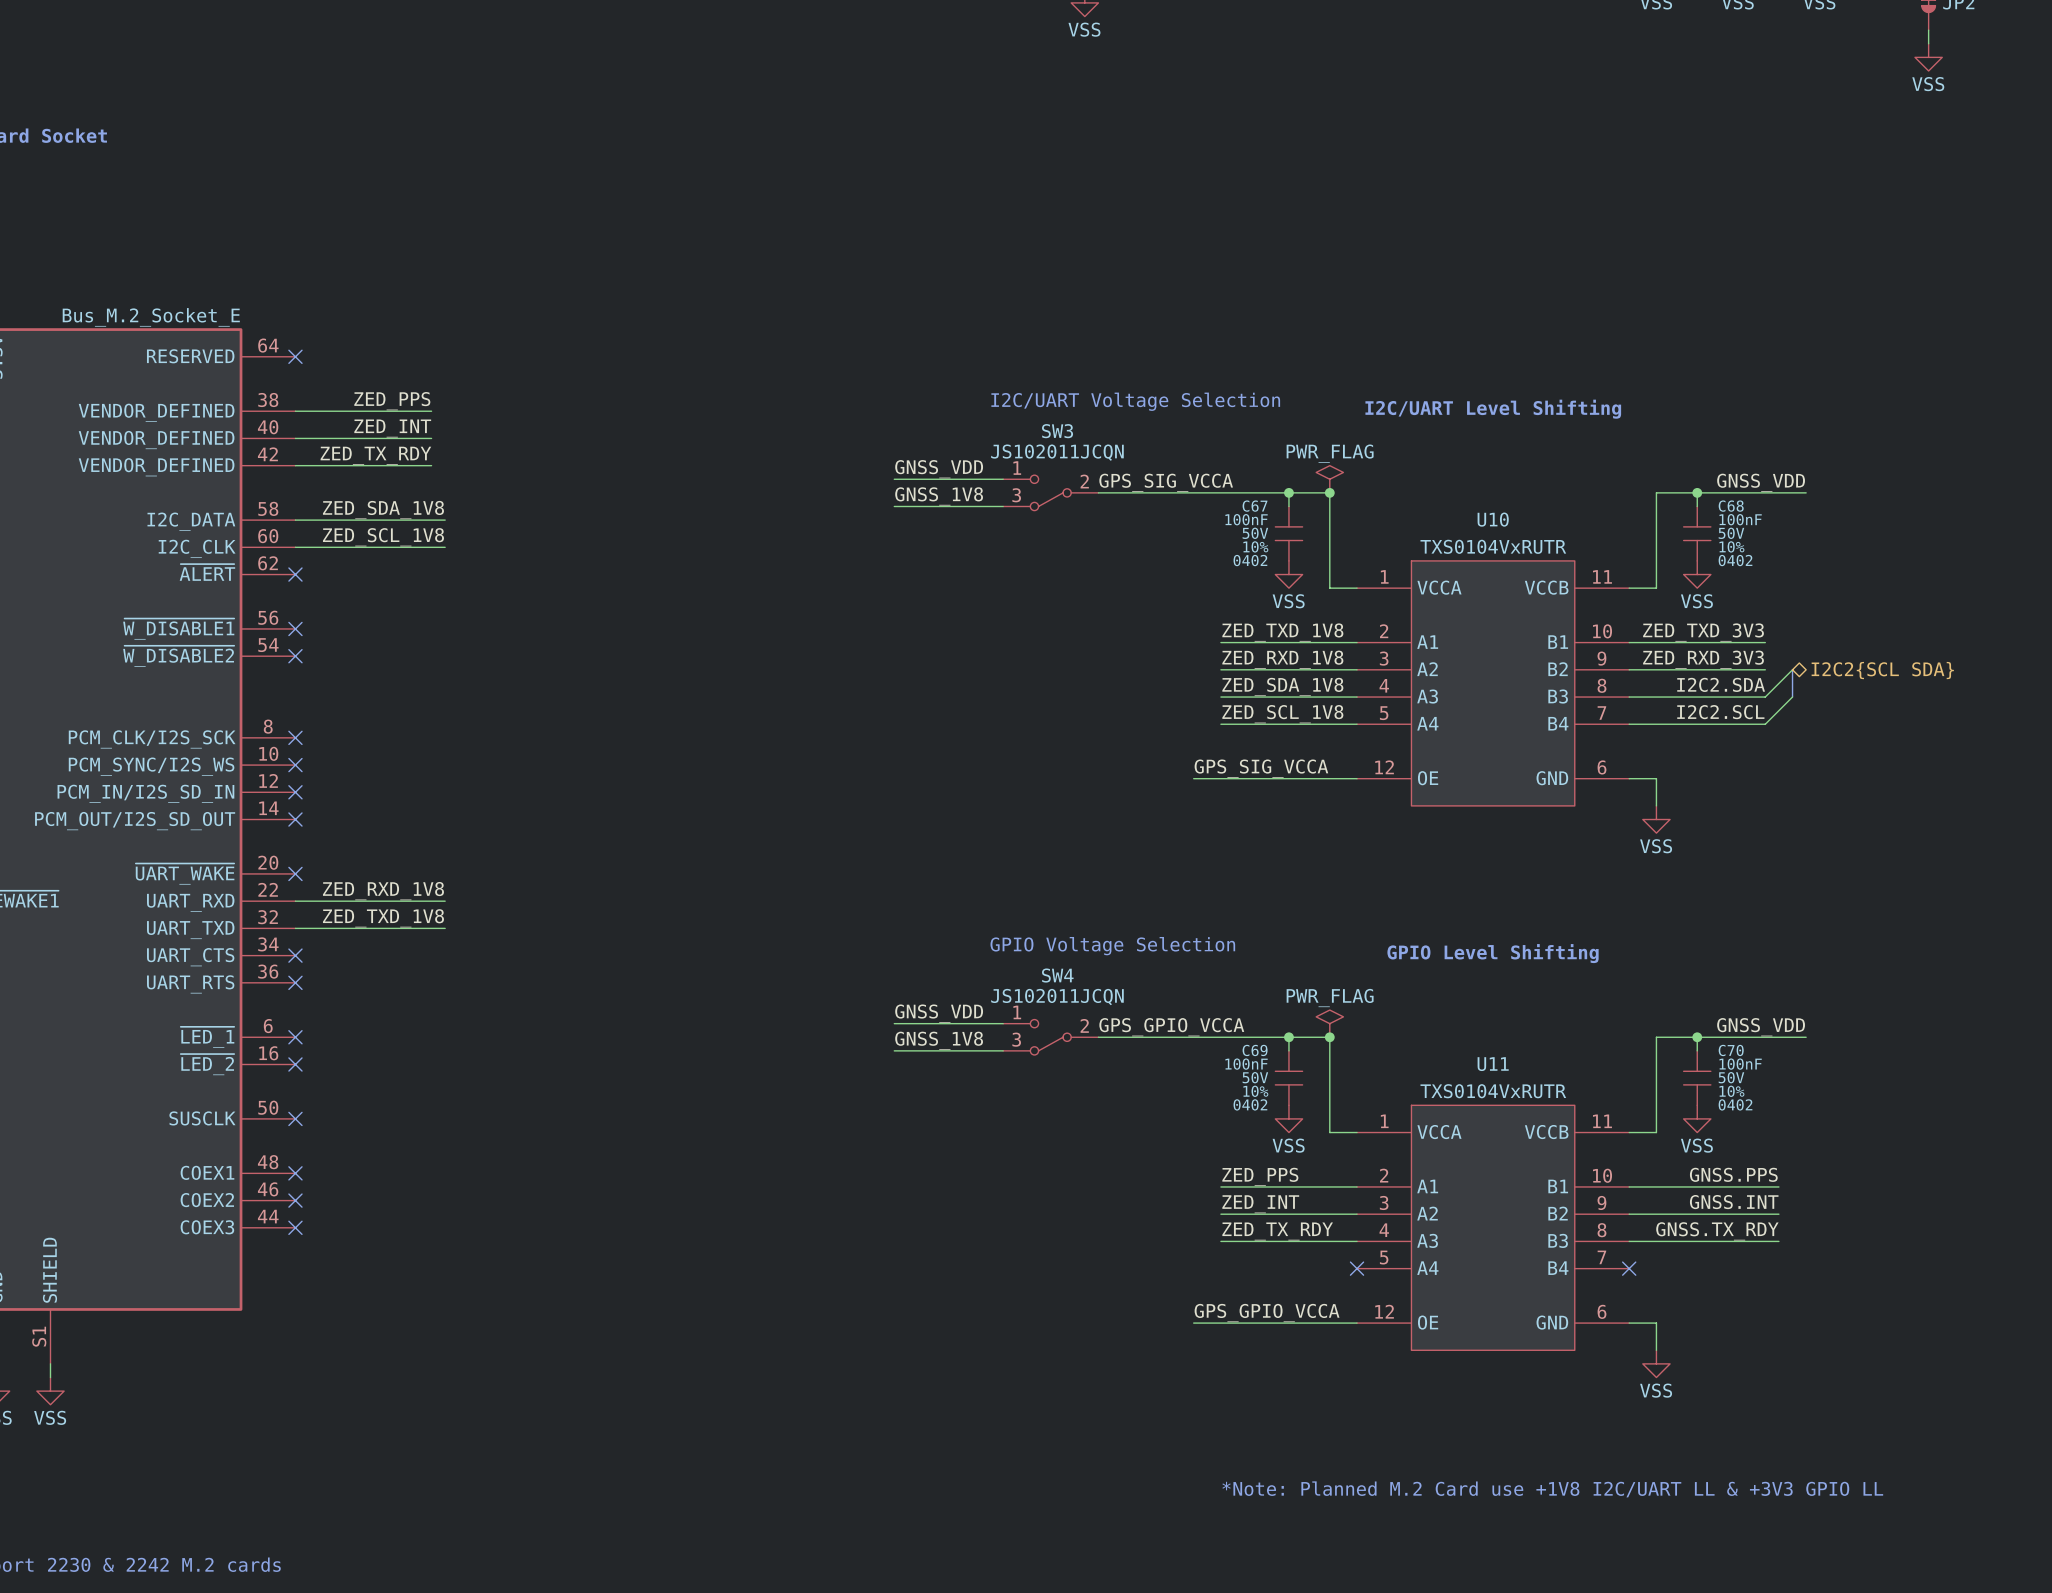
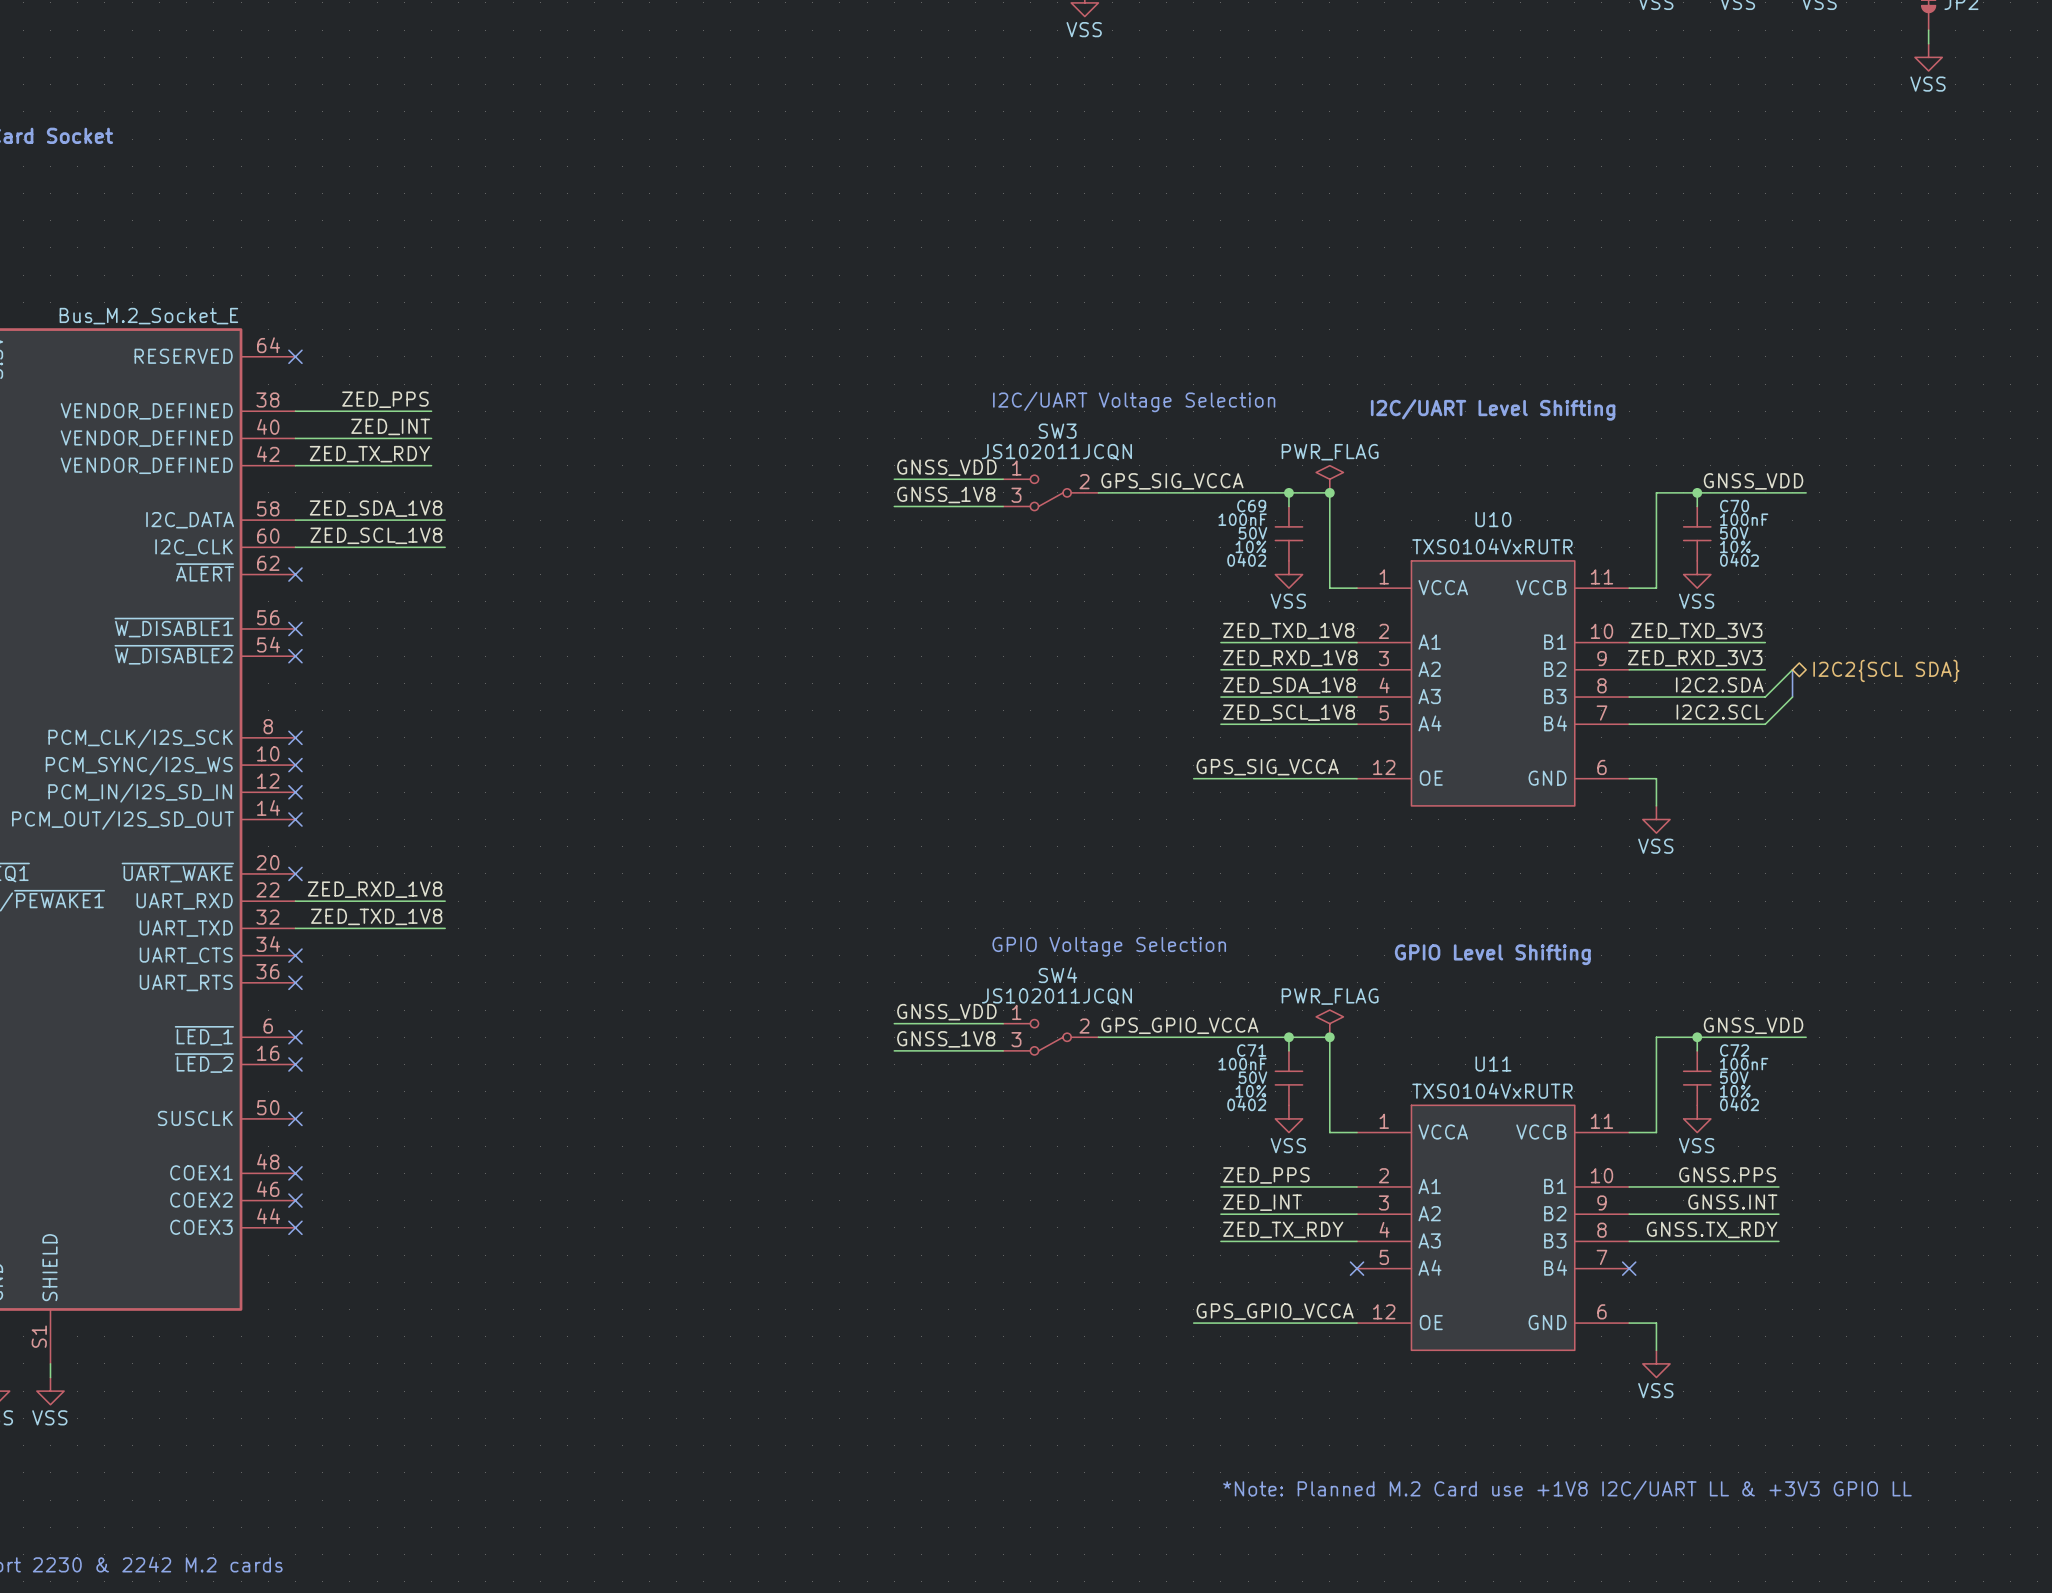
C67 name: C67 (1255, 506) -> C69 (1251, 506)
C68 name: C68 (1731, 506) -> C70 (1734, 506)
C69 name: C69 (1255, 1050) -> C71 (1251, 1050)
C70 name: C70 (1731, 1050) -> C72 (1734, 1050)

